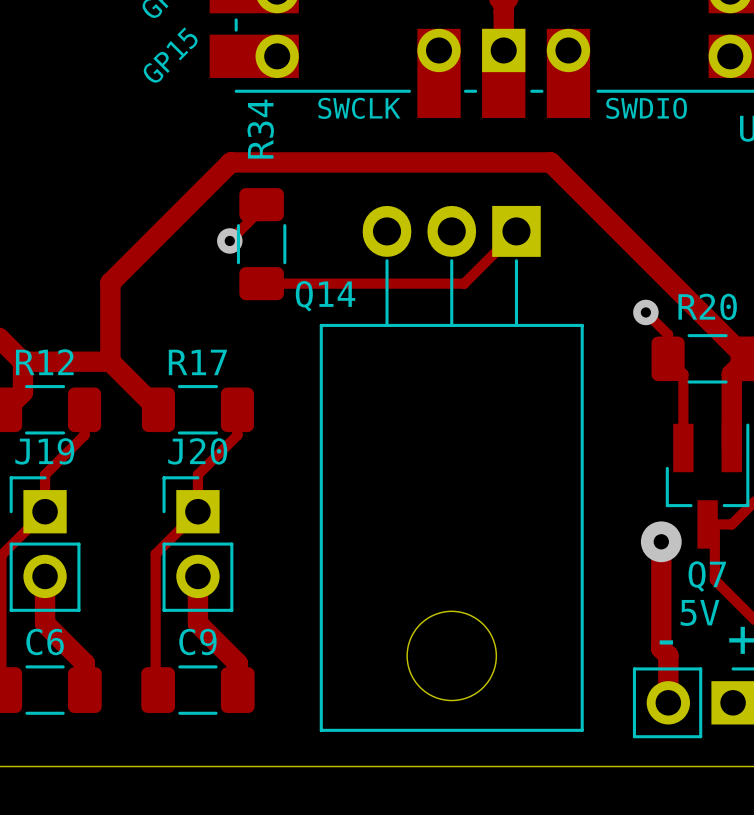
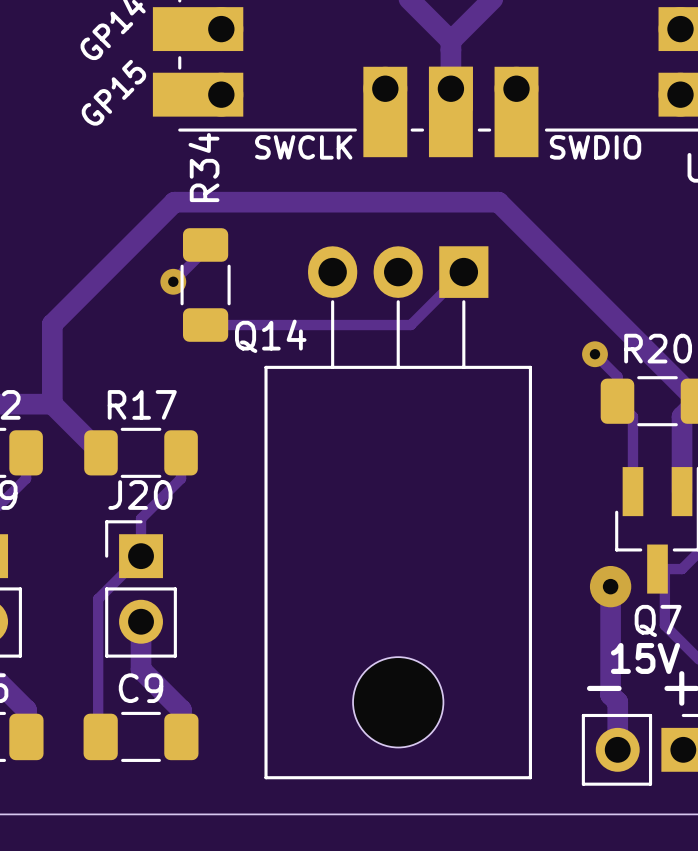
text: 5V (700, 612) -> 15V (645, 658)

